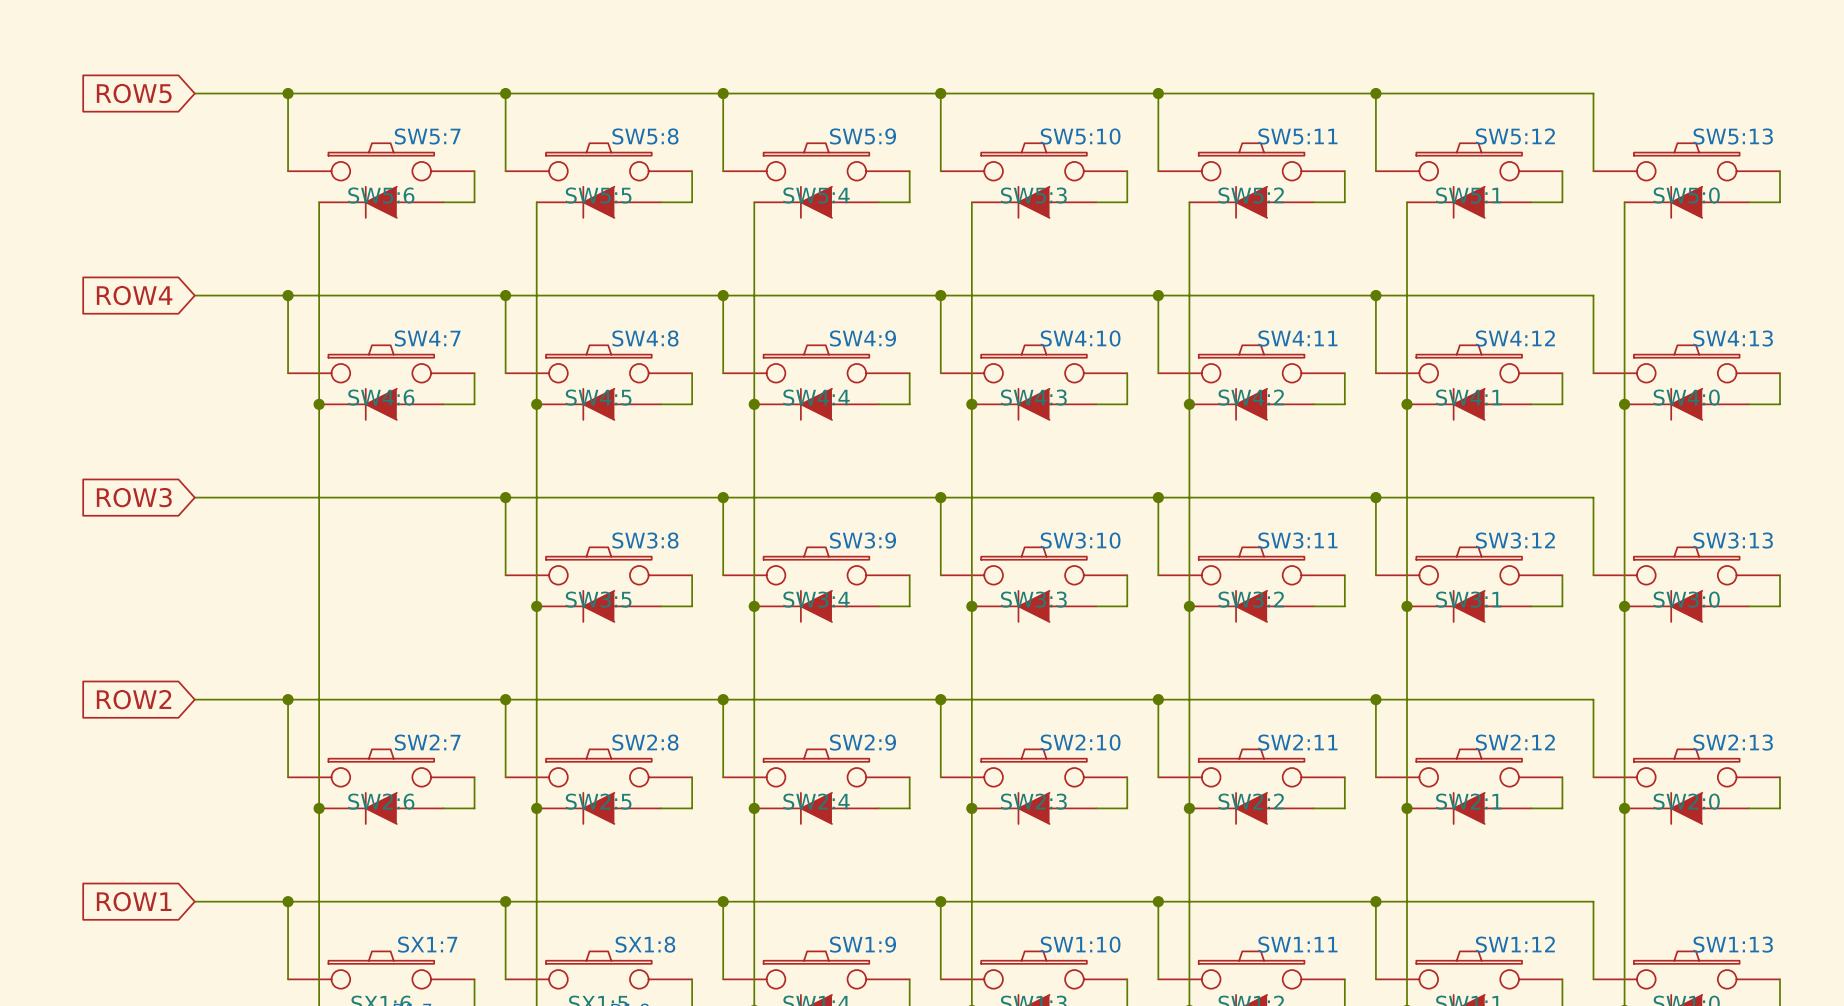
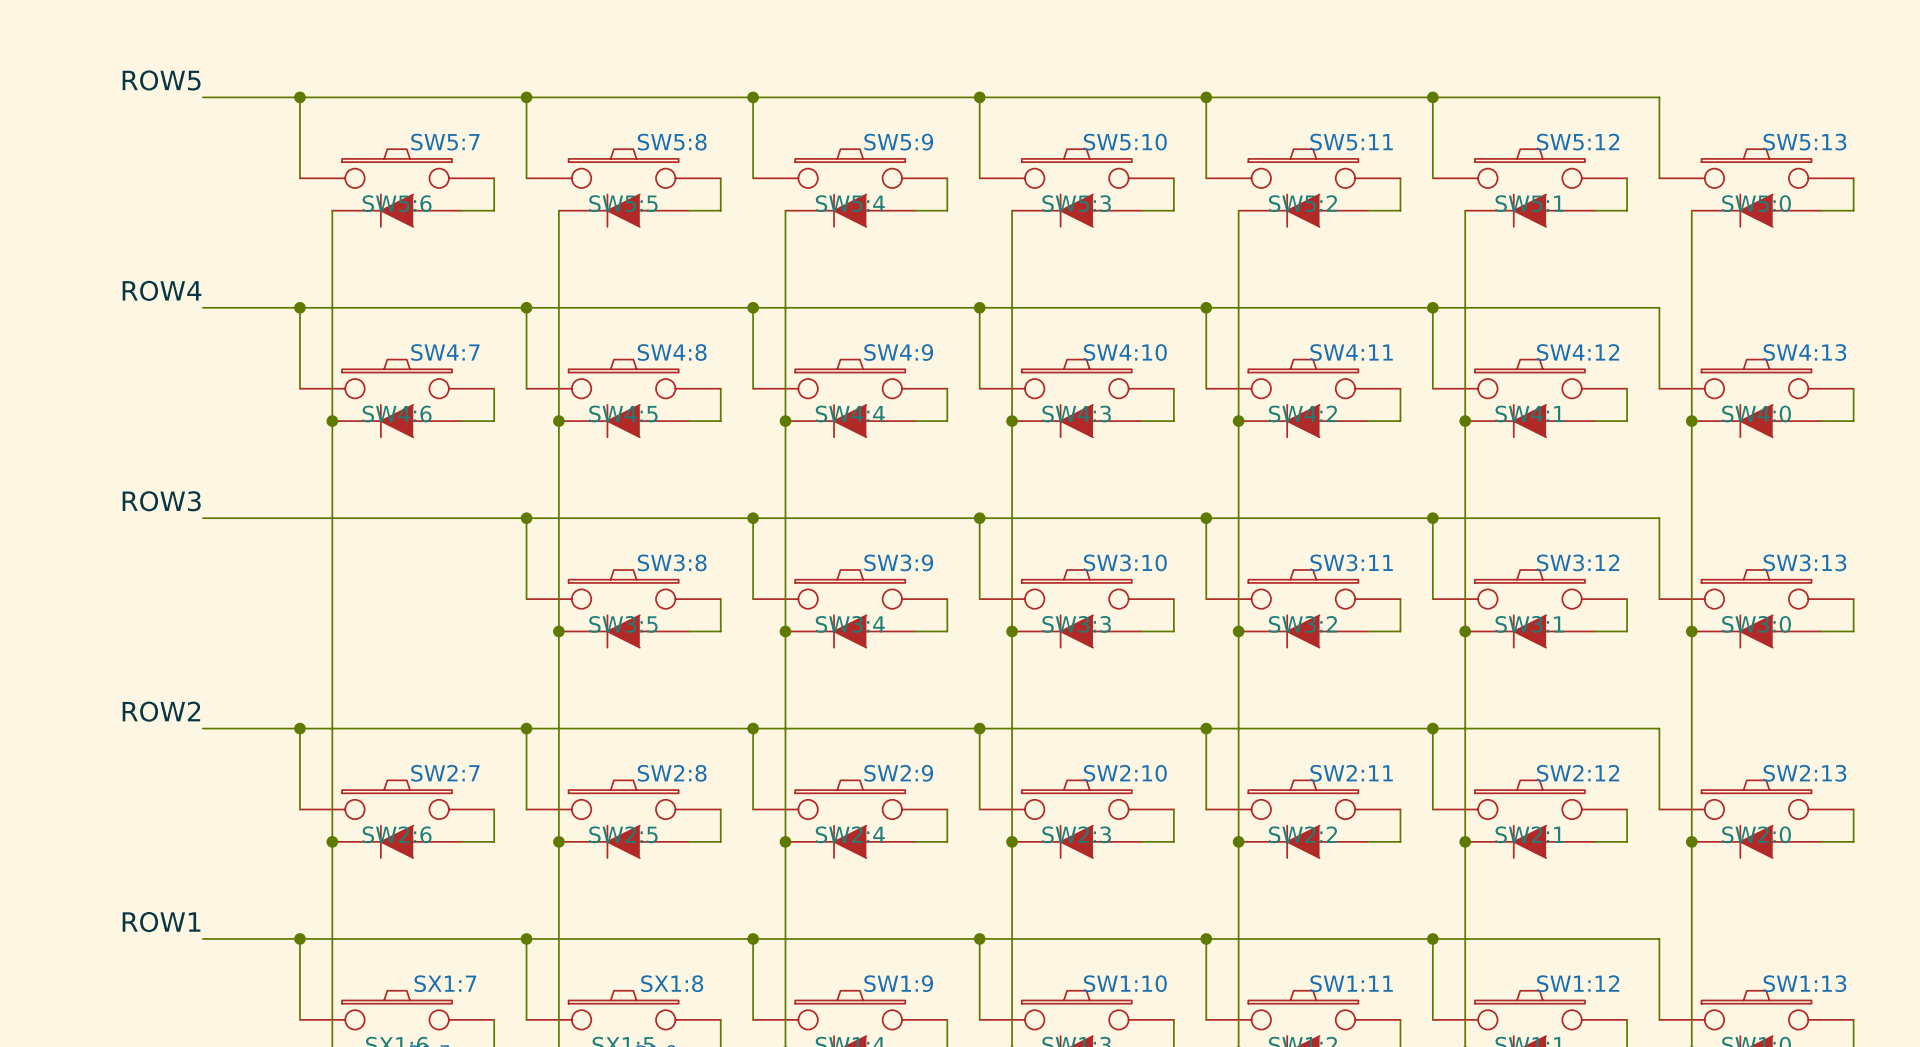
label: none -> ROW5 (161, 80)
global label: ROW5 (134, 93) -> none
label: none -> ROW4 (162, 290)
global label: ROW4 (134, 295) -> none
label: none -> ROW3 (161, 501)
global label: ROW3 (134, 497) -> none
label: none -> ROW2 (161, 711)
global label: ROW2 (134, 699) -> none
label: none -> ROW1 (161, 922)
global label: ROW1 (134, 901) -> none

